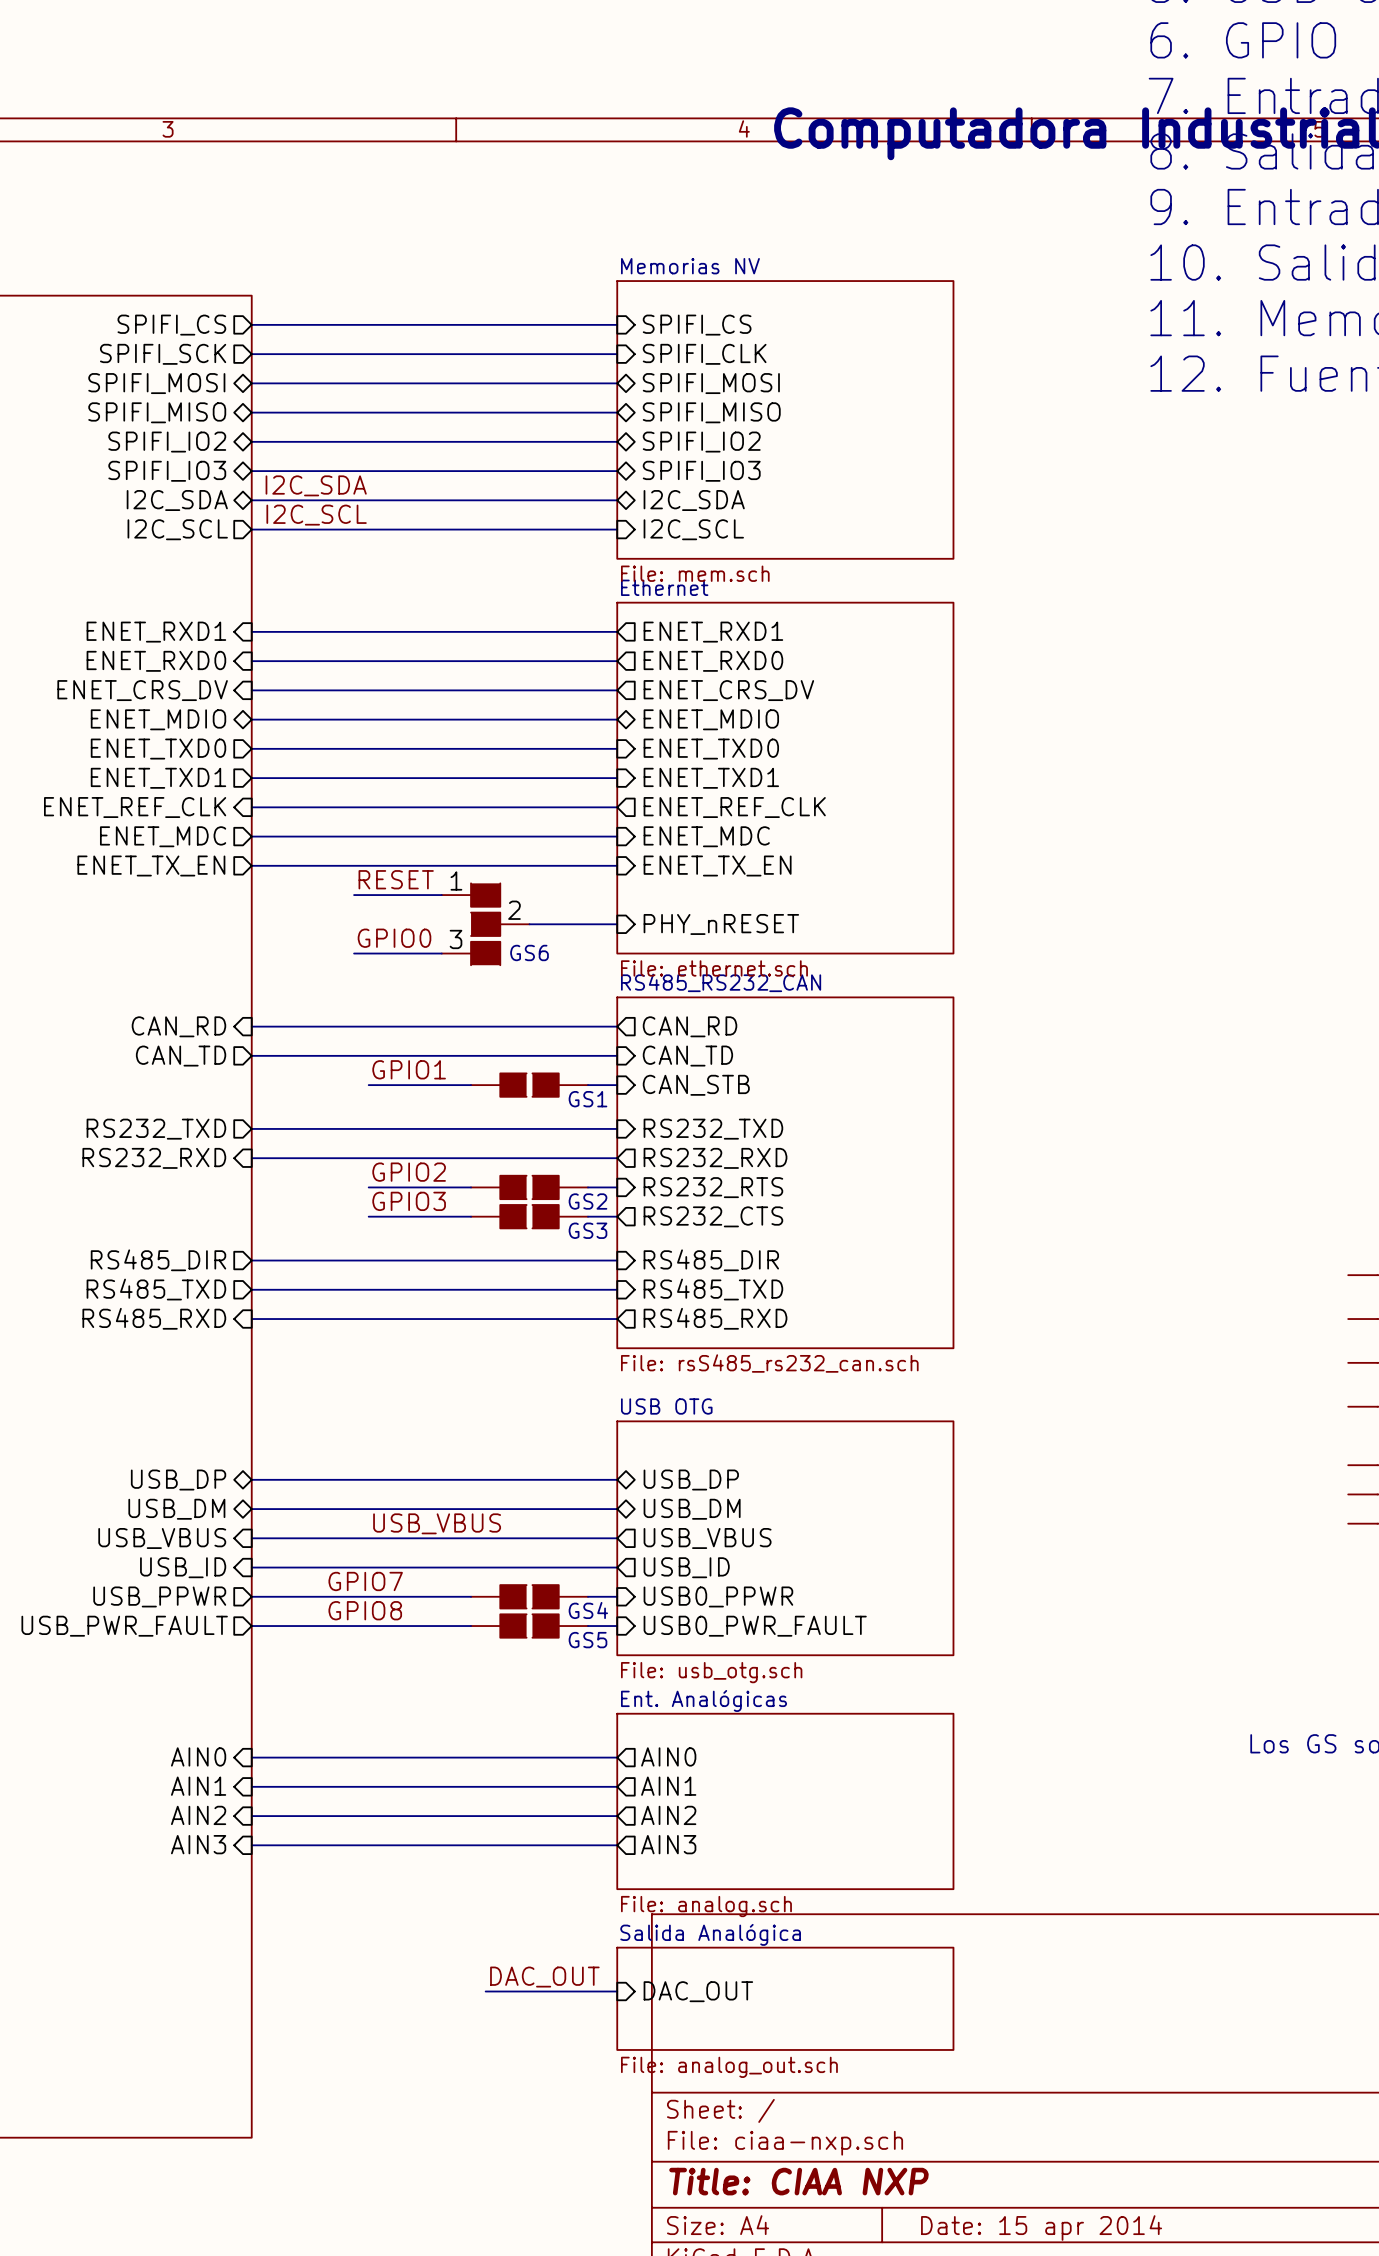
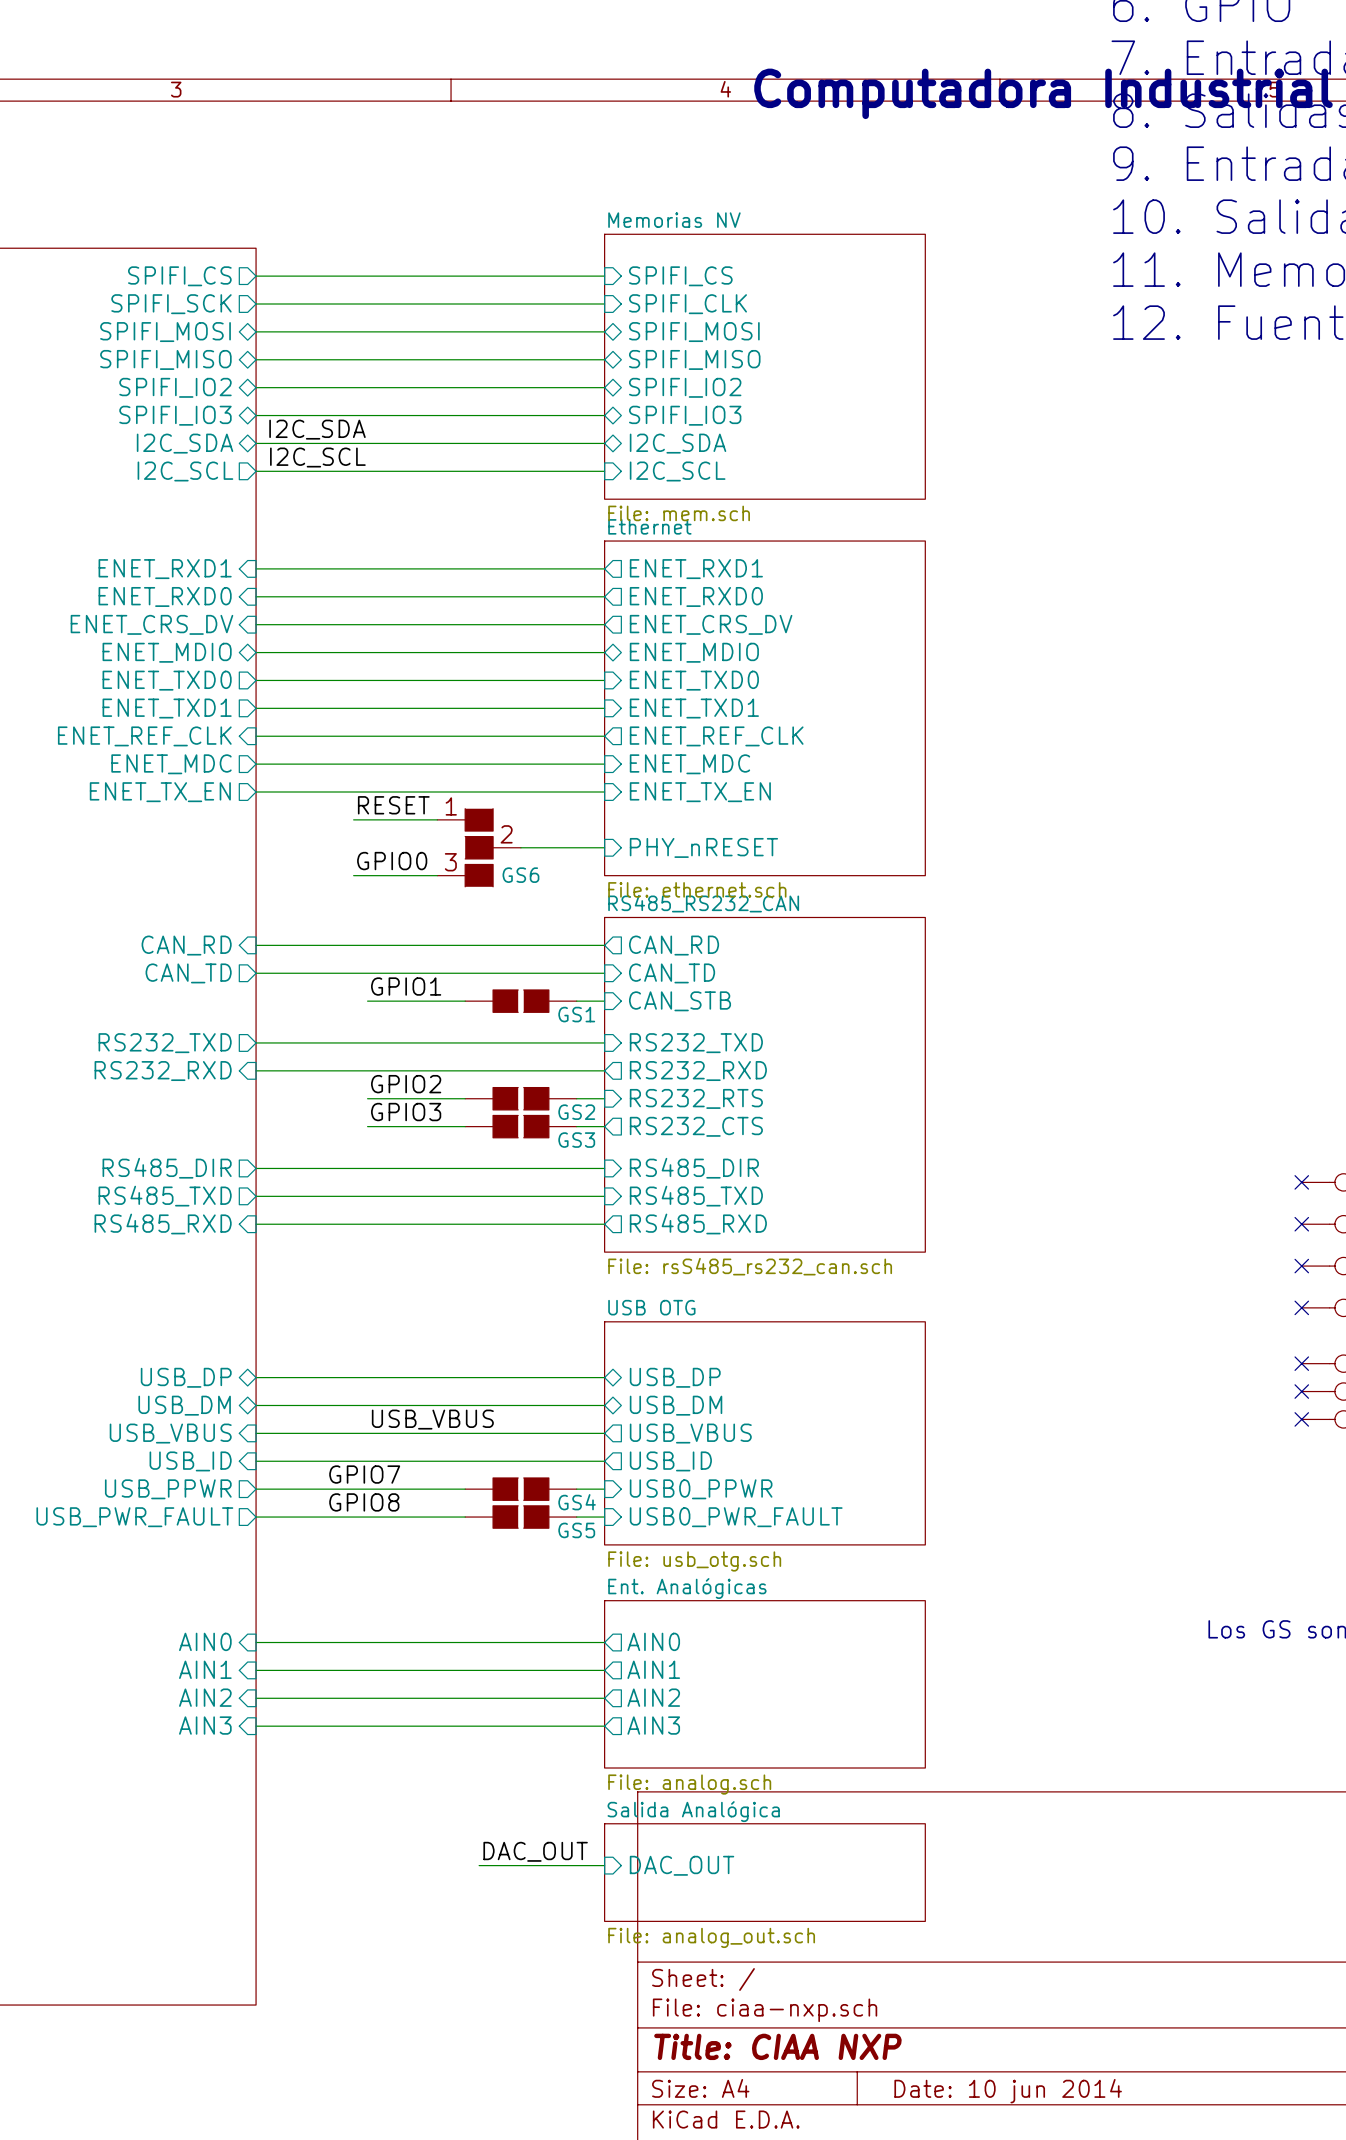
no-connect mark: none -> (1301, 1182)
no-connect mark: none -> (1301, 1224)
no-connect mark: none -> (1301, 1266)
no-connect mark: none -> (1301, 1307)
no-connect mark: none -> (1301, 1363)
no-connect mark: none -> (1301, 1391)
no-connect mark: none -> (1301, 1419)
title block: Date: 15 apr 2014 (1041, 2228) -> Date: 10 jun 2014 (1008, 2091)

